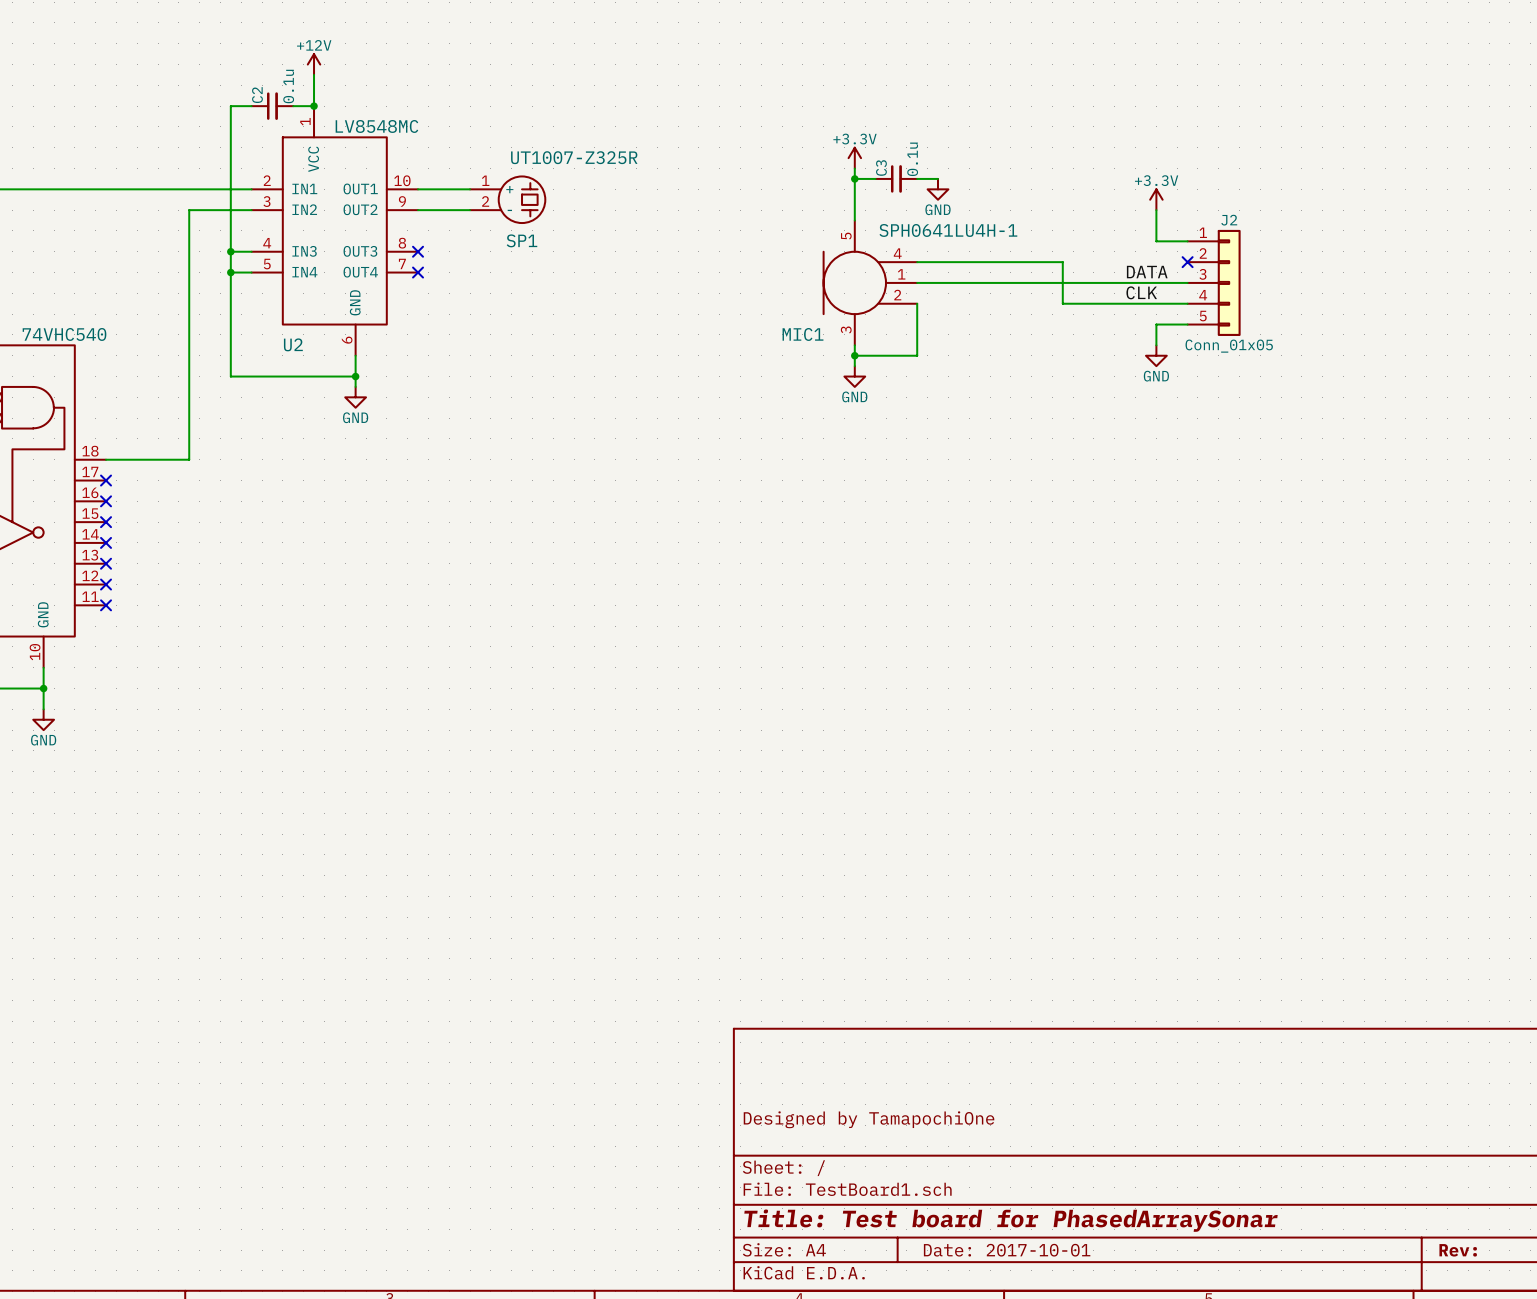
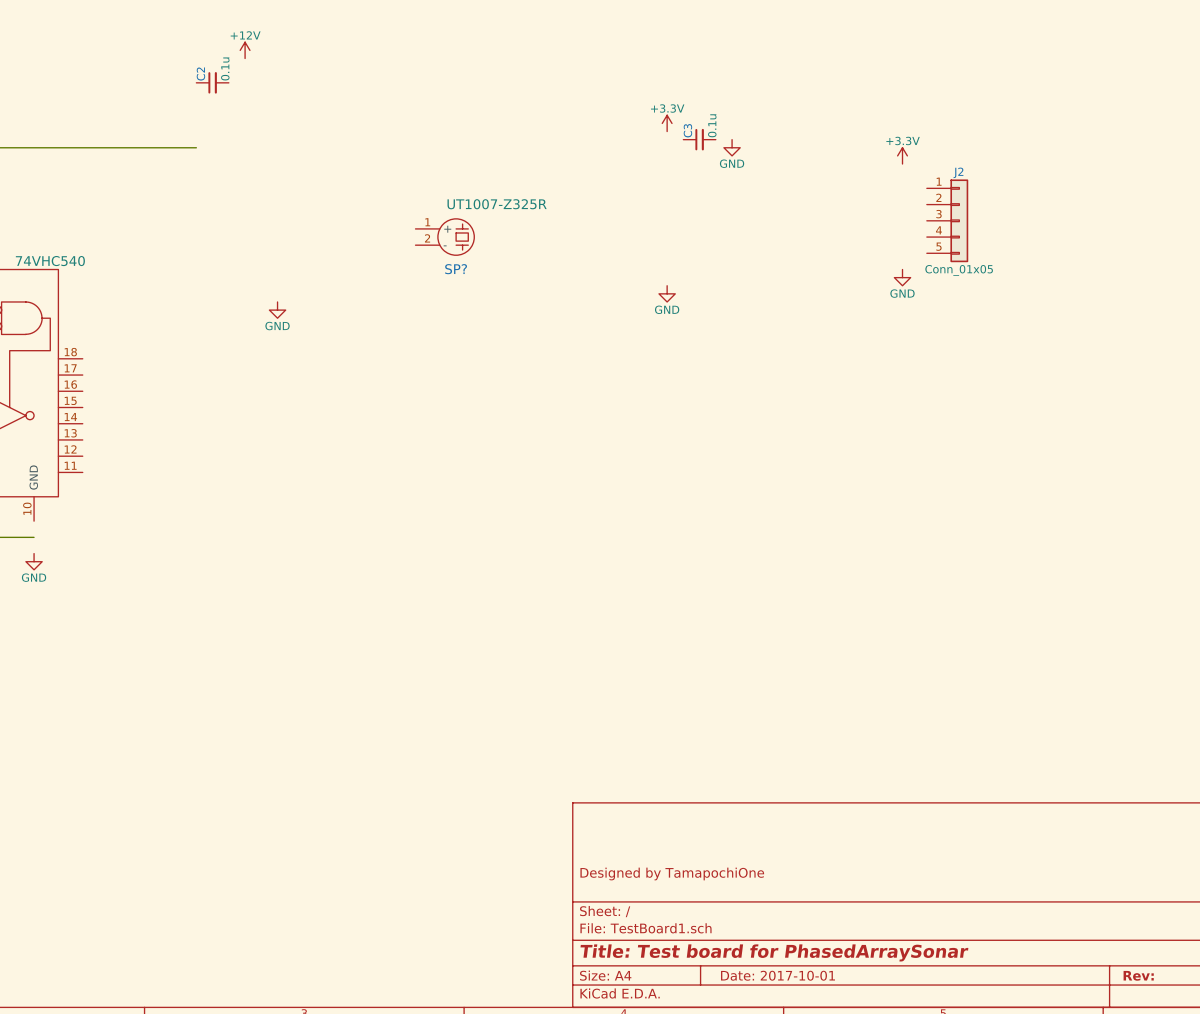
wire: (314, 74) (314, 106) (293, 106) -> none
wire: (251, 106) (230, 106) (230, 376) (355, 376) -> none
junction: (314, 106) -> none
wire: (854, 168) (854, 220) -> none
wire: (854, 178) (875, 178) -> none
junction: (854, 178) -> none
wire: (917, 178) (938, 178) -> none
wire: (418, 189) (470, 189) -> none
SP1: UT1007-Z325R (507, 199) -> none
wire: (251, 210) (189, 210) (189, 459) (106, 459) -> none
wire: (418, 210) (470, 210) -> none
wire: (1156, 210) (1156, 241) (1187, 241) -> none
U2: LV8548MC (334, 230) -> none
wire: (230, 251) (251, 251) -> none
junction: (230, 251) -> none
no-connect mark: (418, 251) -> none
wire: (917, 262) (1062, 262) (1062, 303) (1187, 303) -> none
no-connect mark: (1187, 262) -> none
wire: (230, 272) (251, 272) -> none
junction: (230, 272) -> none
no-connect mark: (418, 272) -> none
label: DATA (1147, 272) -> none
MIC1: SPH0641LU4H-1 (870, 282) -> none
wire: (917, 282) (1187, 282) -> none
label: CLK (1141, 292) -> none
SP?: none -> UT1007-Z325R (444, 237)
wire: (917, 303) (917, 355) (854, 355) -> none
wire: (1187, 324) (1156, 324) (1156, 345) -> none
wire: (854, 345) (854, 366) -> none
wire: (355, 355) (355, 386) -> none
junction: (854, 355) -> none
junction: (355, 376) -> none
no-connect mark: (106, 480) -> none
no-connect mark: (106, 501) -> none
no-connect mark: (106, 522) -> none
no-connect mark: (106, 542) -> none
no-connect mark: (106, 563) -> none
no-connect mark: (106, 584) -> none
no-connect mark: (106, 605) -> none
wire: (43, 667) (43, 709) -> none
junction: (43, 688) -> none

